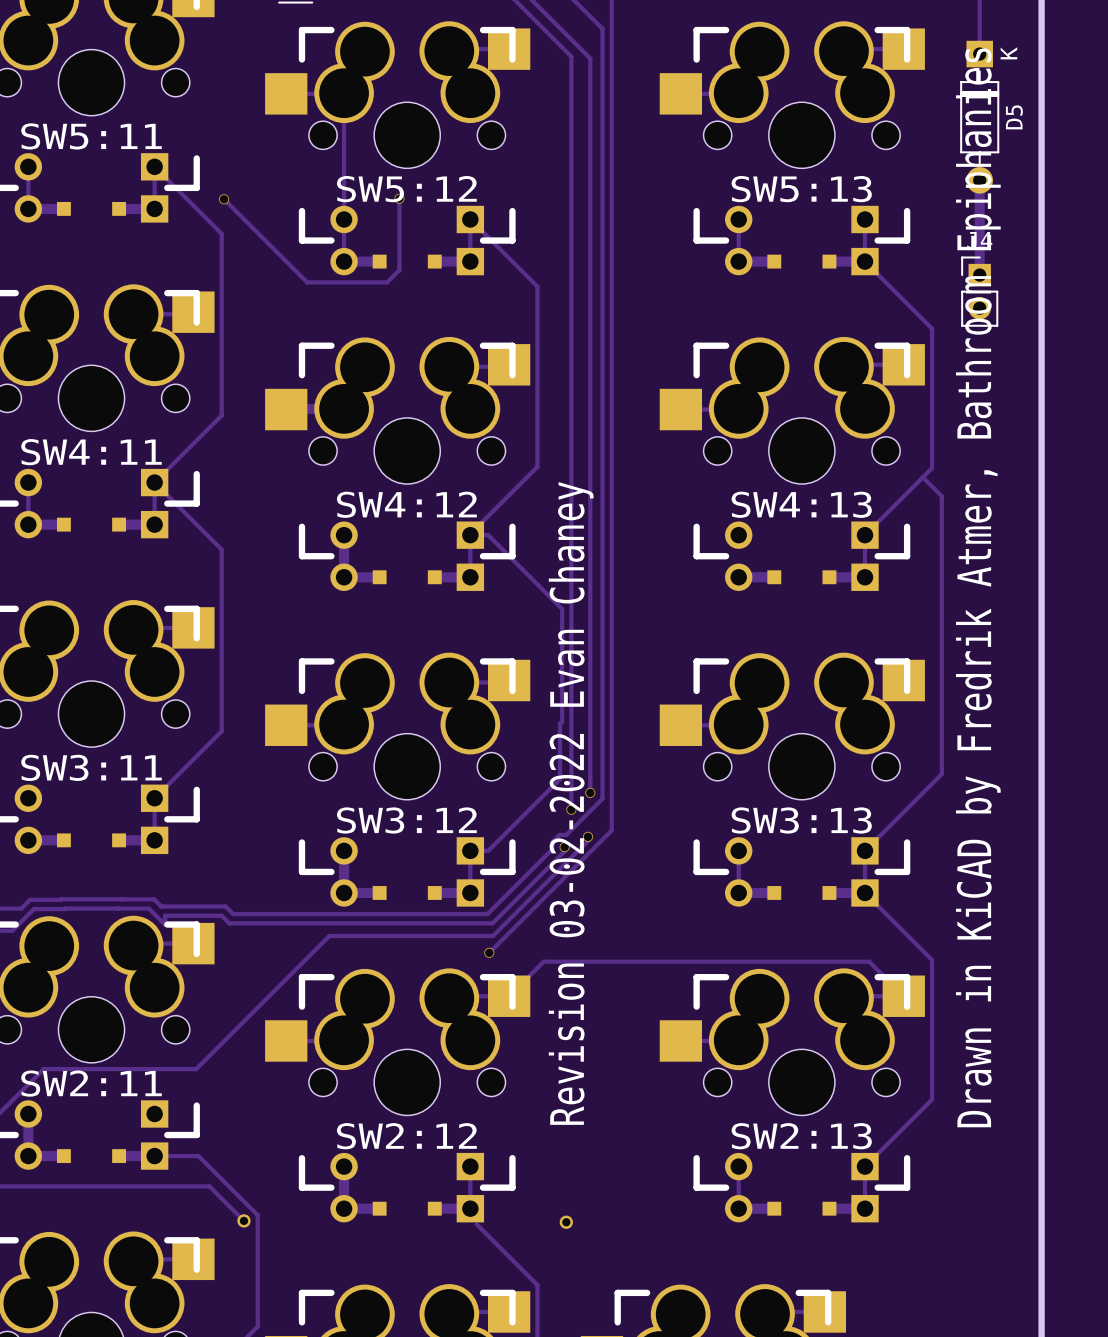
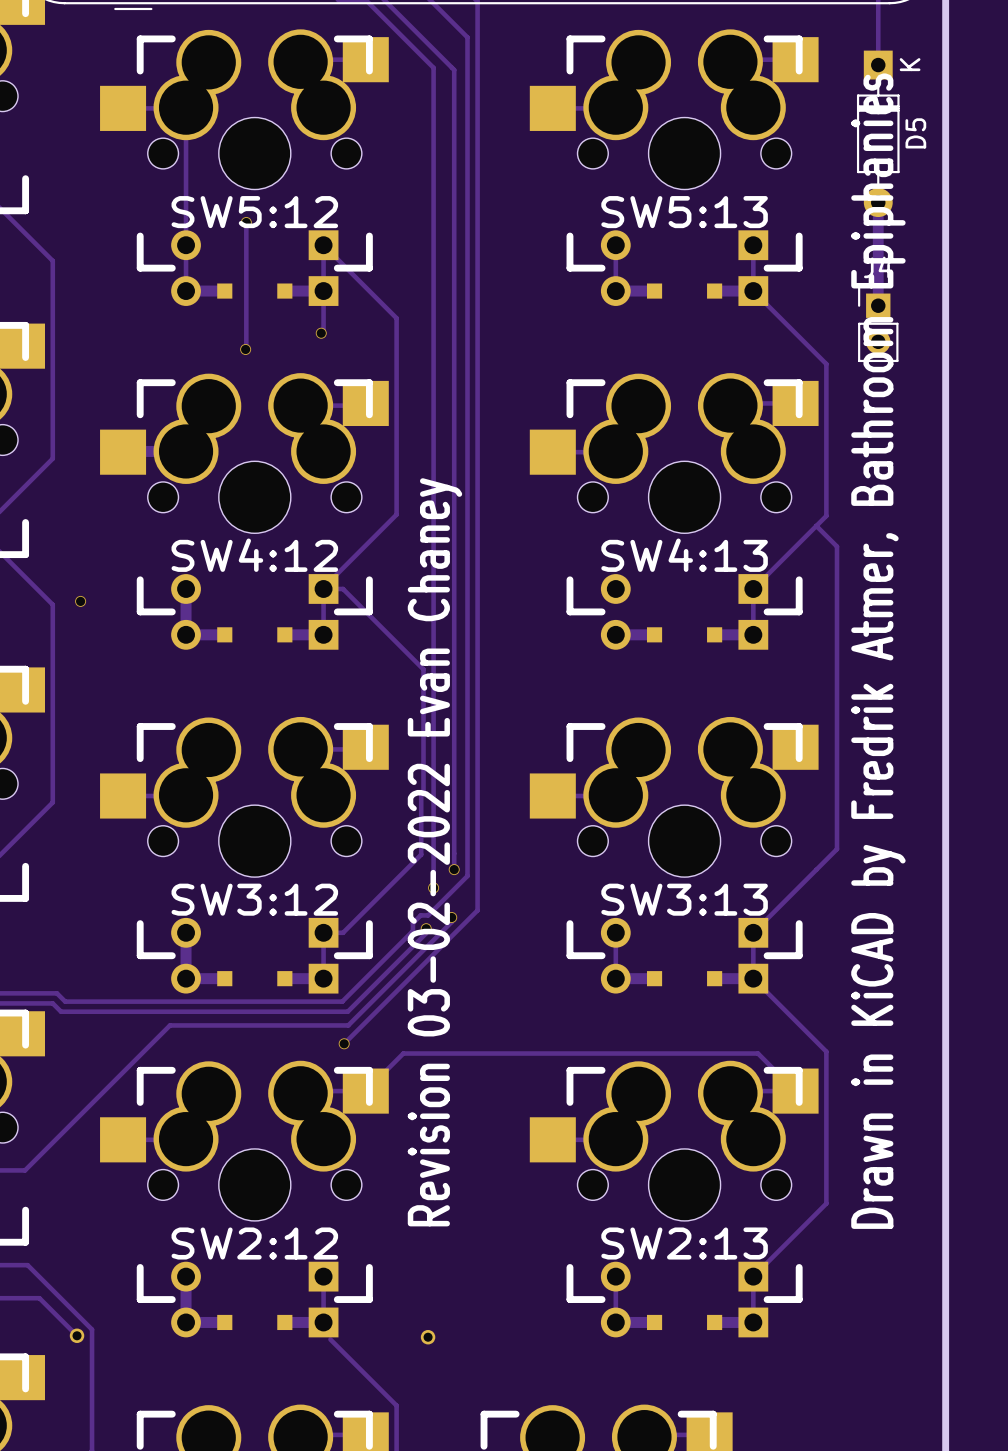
track: (224, 199) (307, 282) (387, 282) (399, 270) -> (245, 349) (246, 300)
via: (224, 199) -> none
track: none -> (323, 304) (323, 330) (321, 333)
via: none -> (321, 333)
via: none -> (245, 349)
via: none -> (80, 601)

